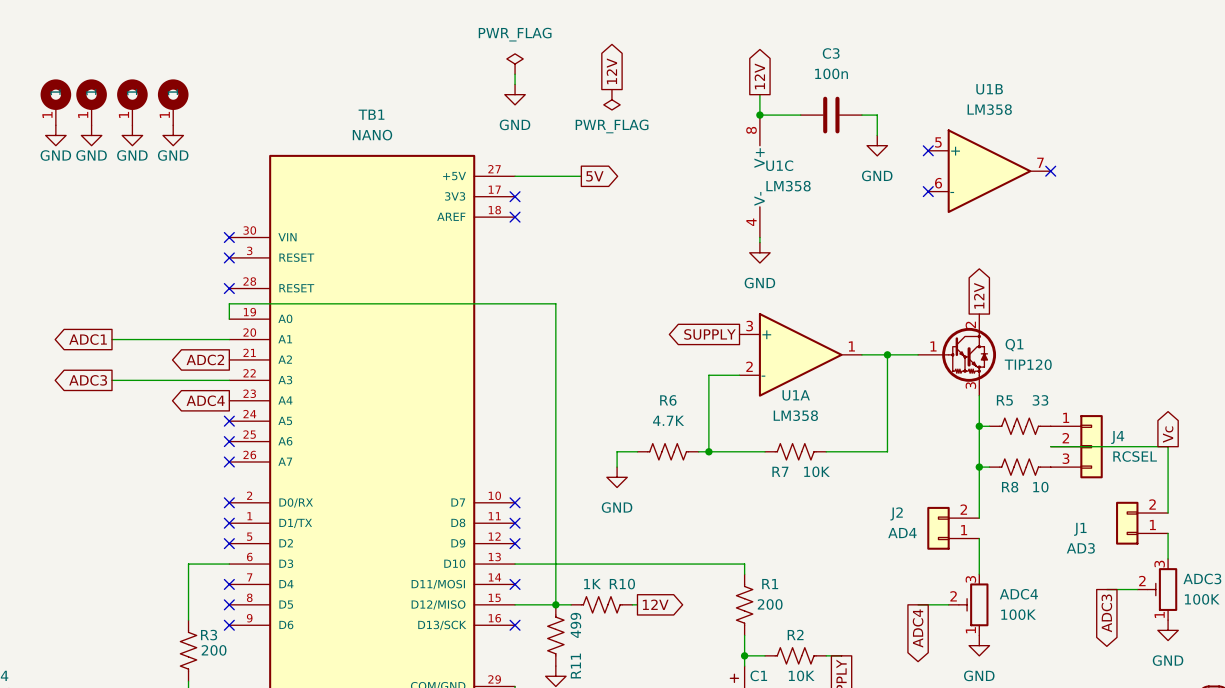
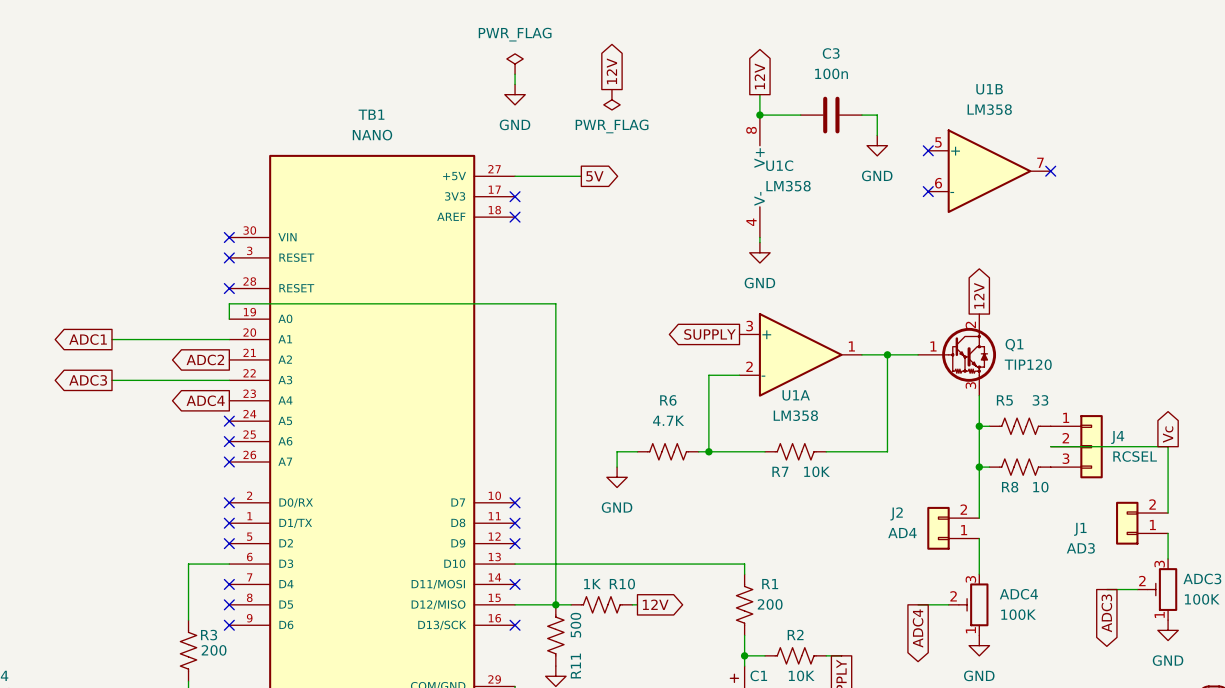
part: (55, 102) -> none
part: (91, 102) -> none
part: (132, 102) -> none
part: (173, 102) -> none
power symbol: GND (55, 135) -> none
power symbol: GND (91, 135) -> none
power symbol: GND (132, 135) -> none
power symbol: GND (173, 135) -> none
R11 value: 499 (575, 625) -> 500 (575, 625)

